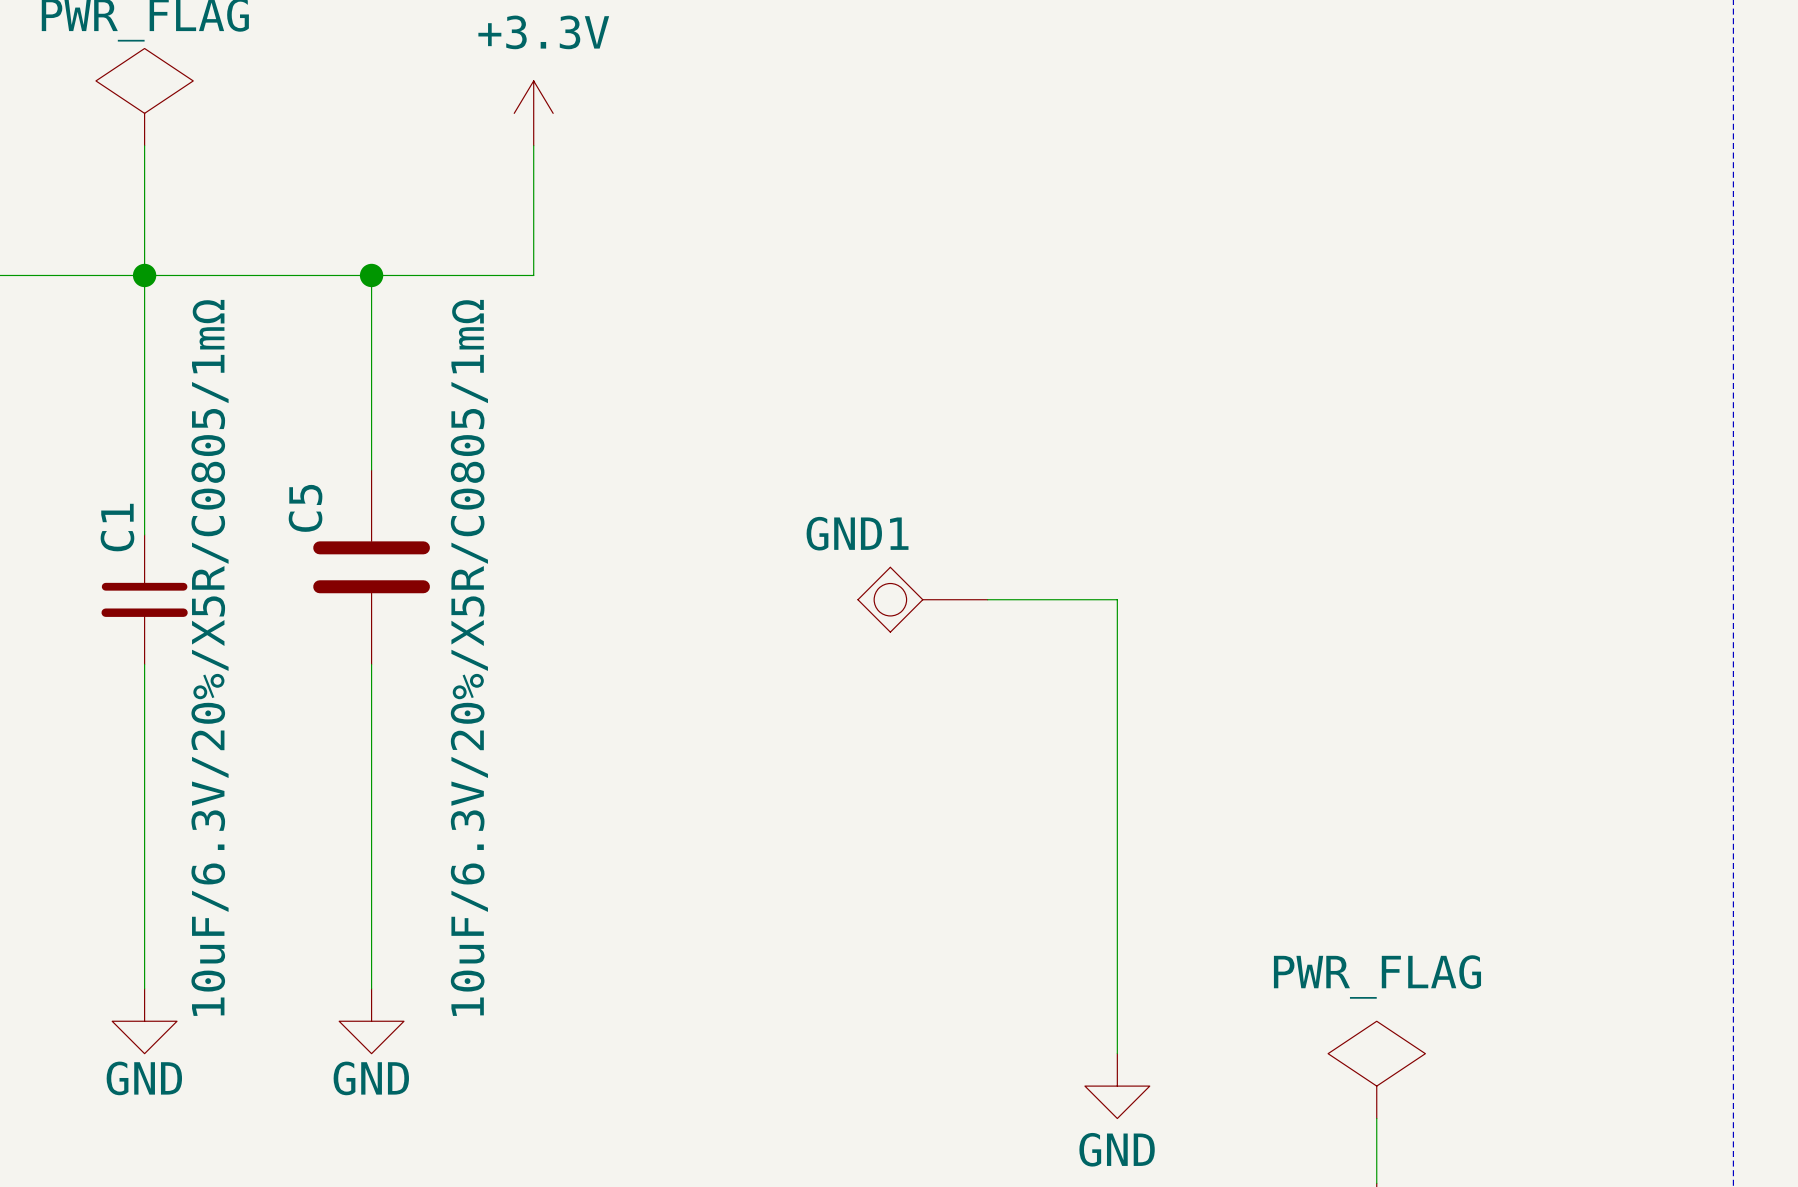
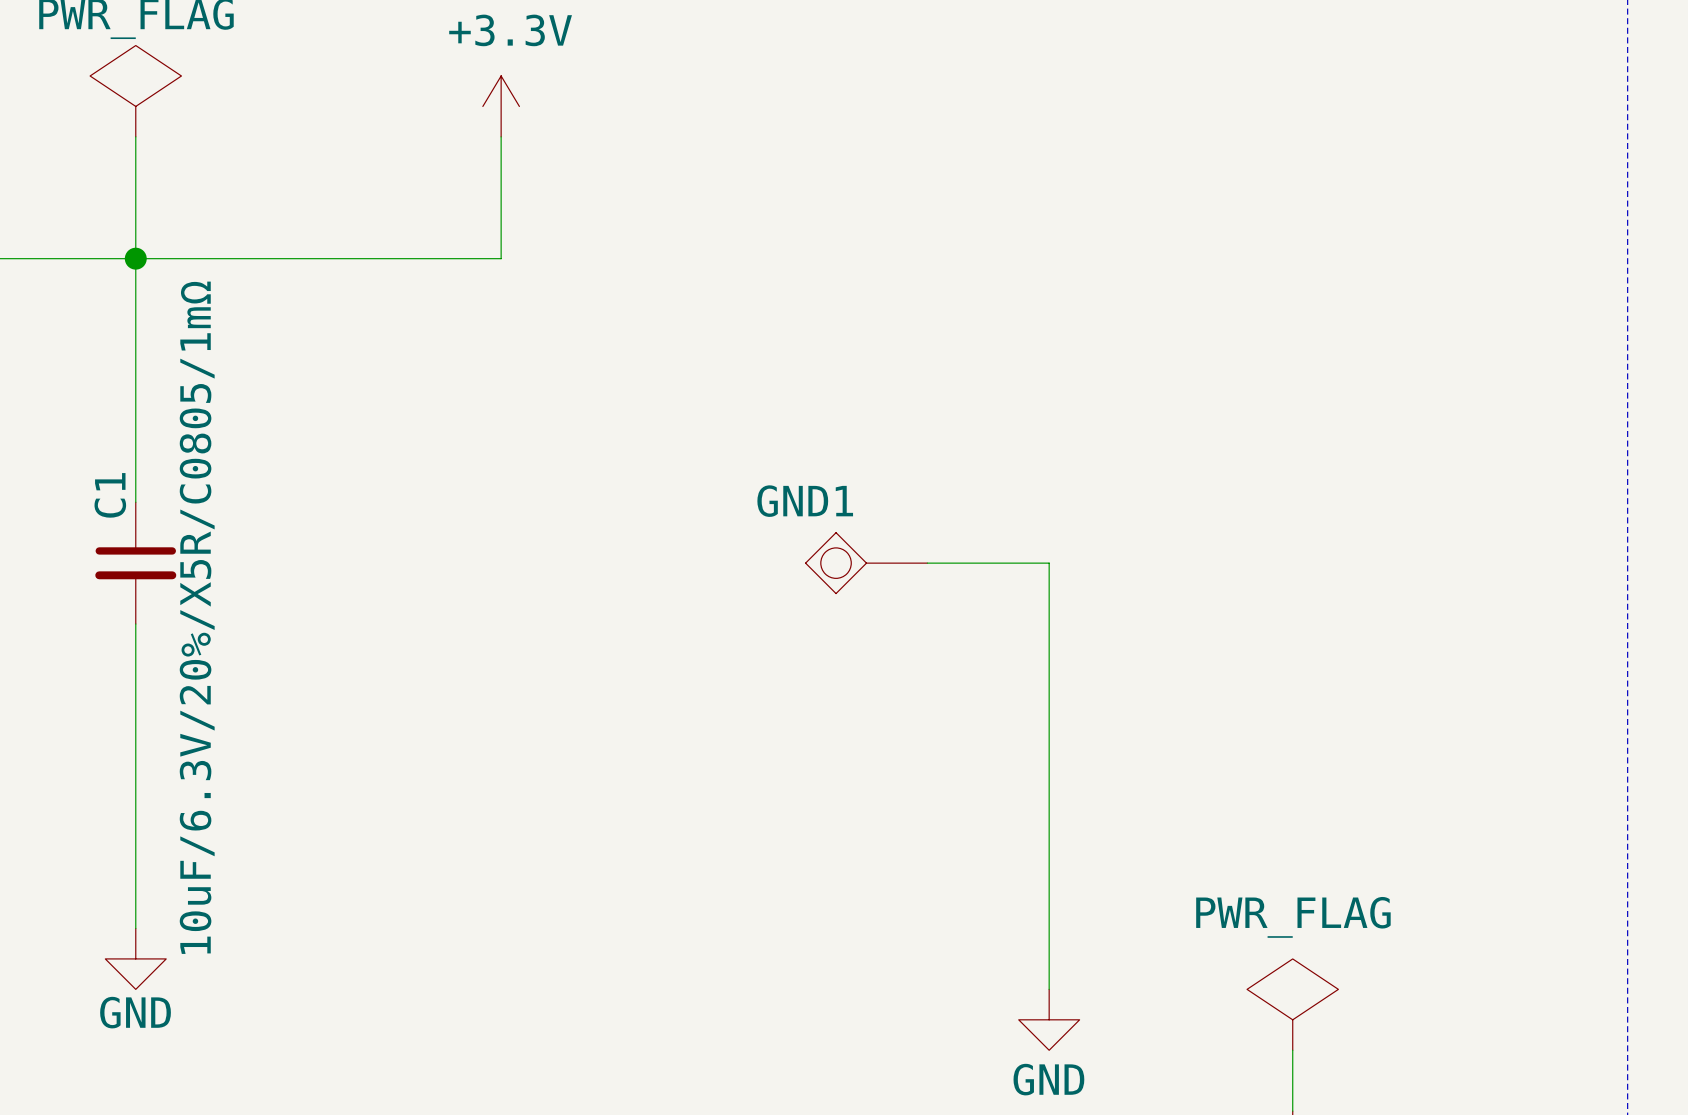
wire: (371, 275) (371, 470) -> none
junction: (371, 275) -> none
C5: 10uF/6.3V/20%/X5R/C0805/1mΩ (371, 567) -> none
wire: (371, 664) (371, 988) -> none
power symbol: GND (371, 1021) -> none

